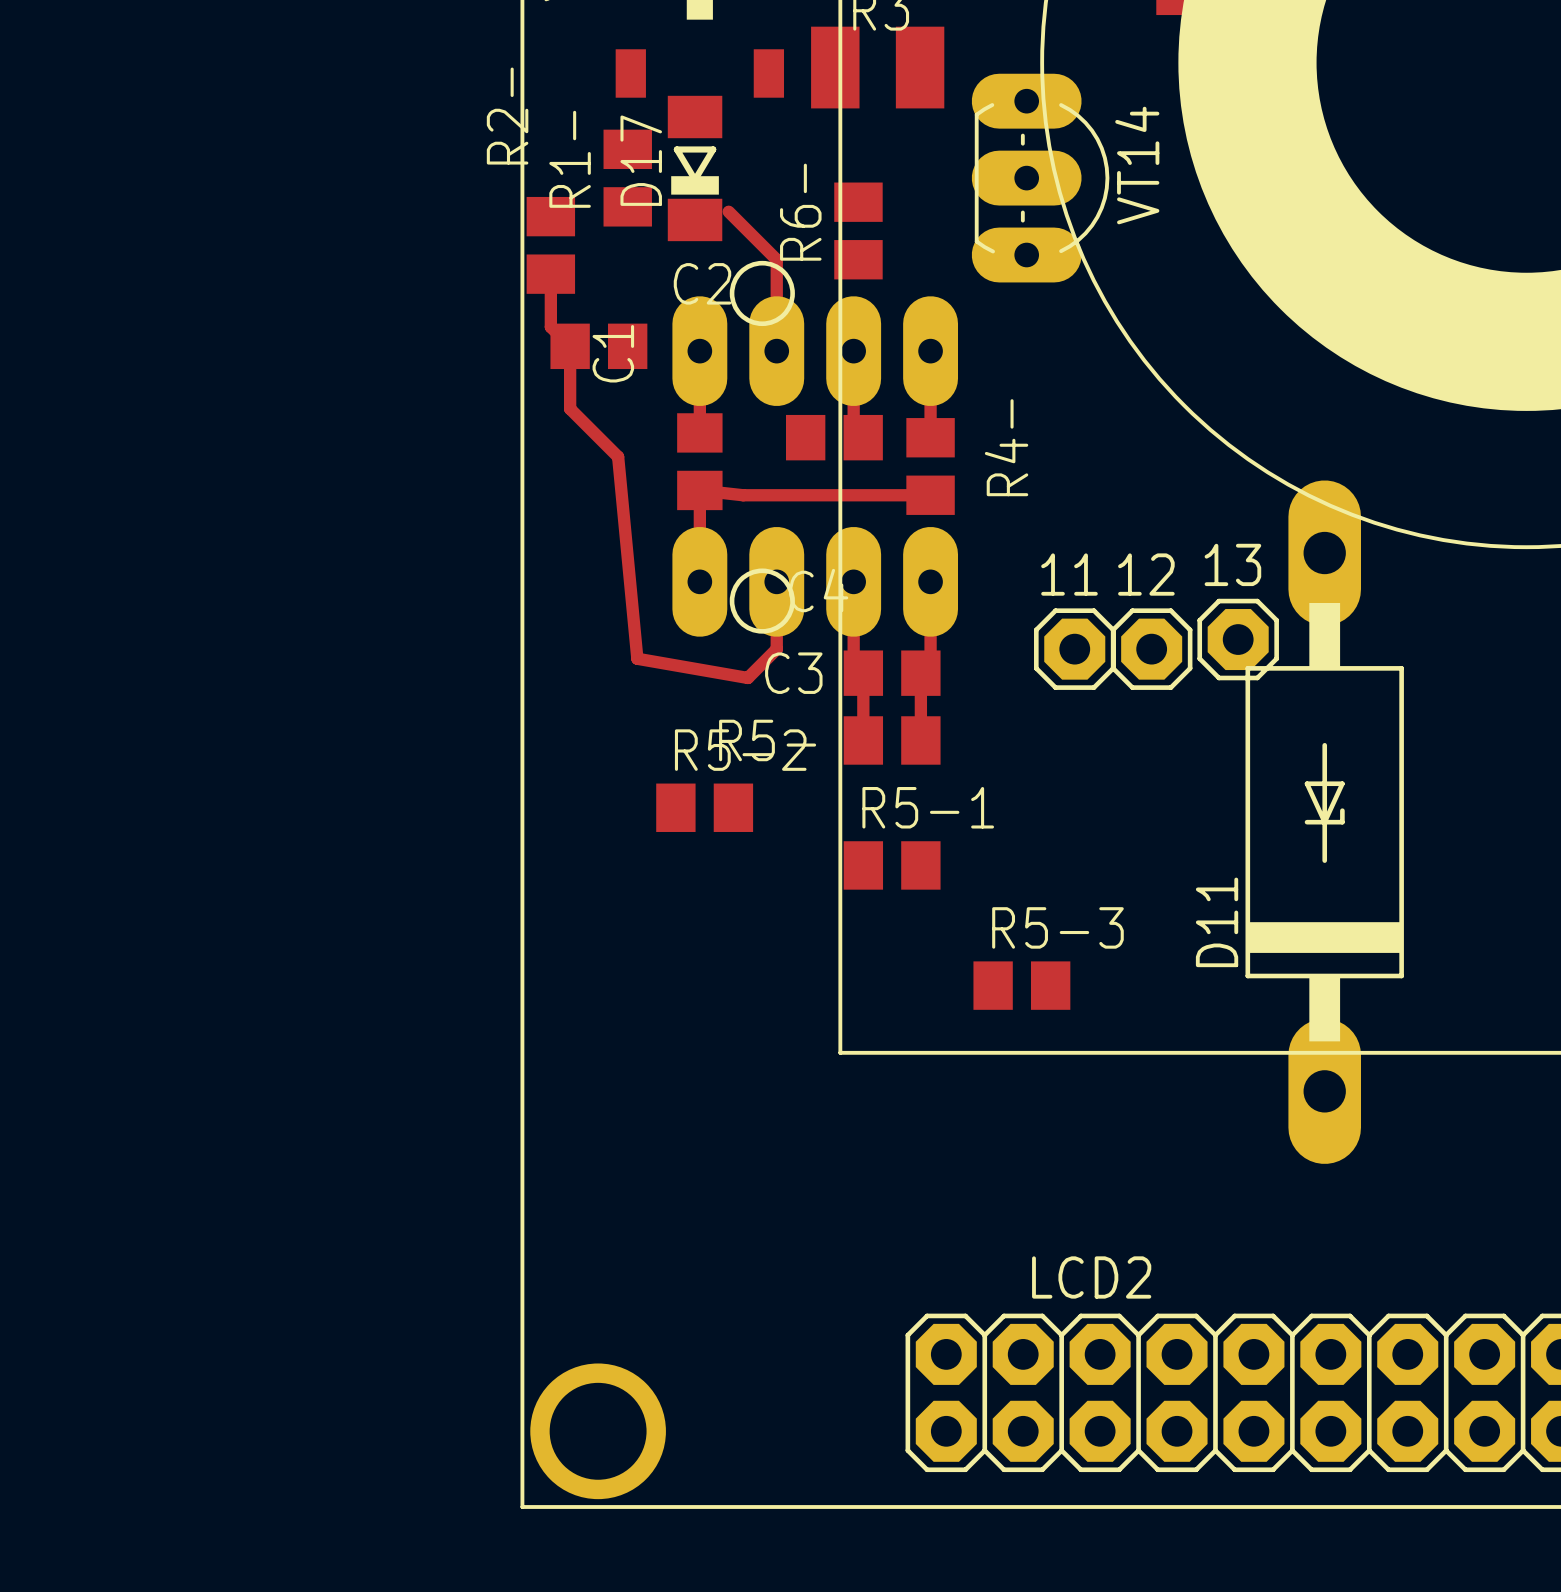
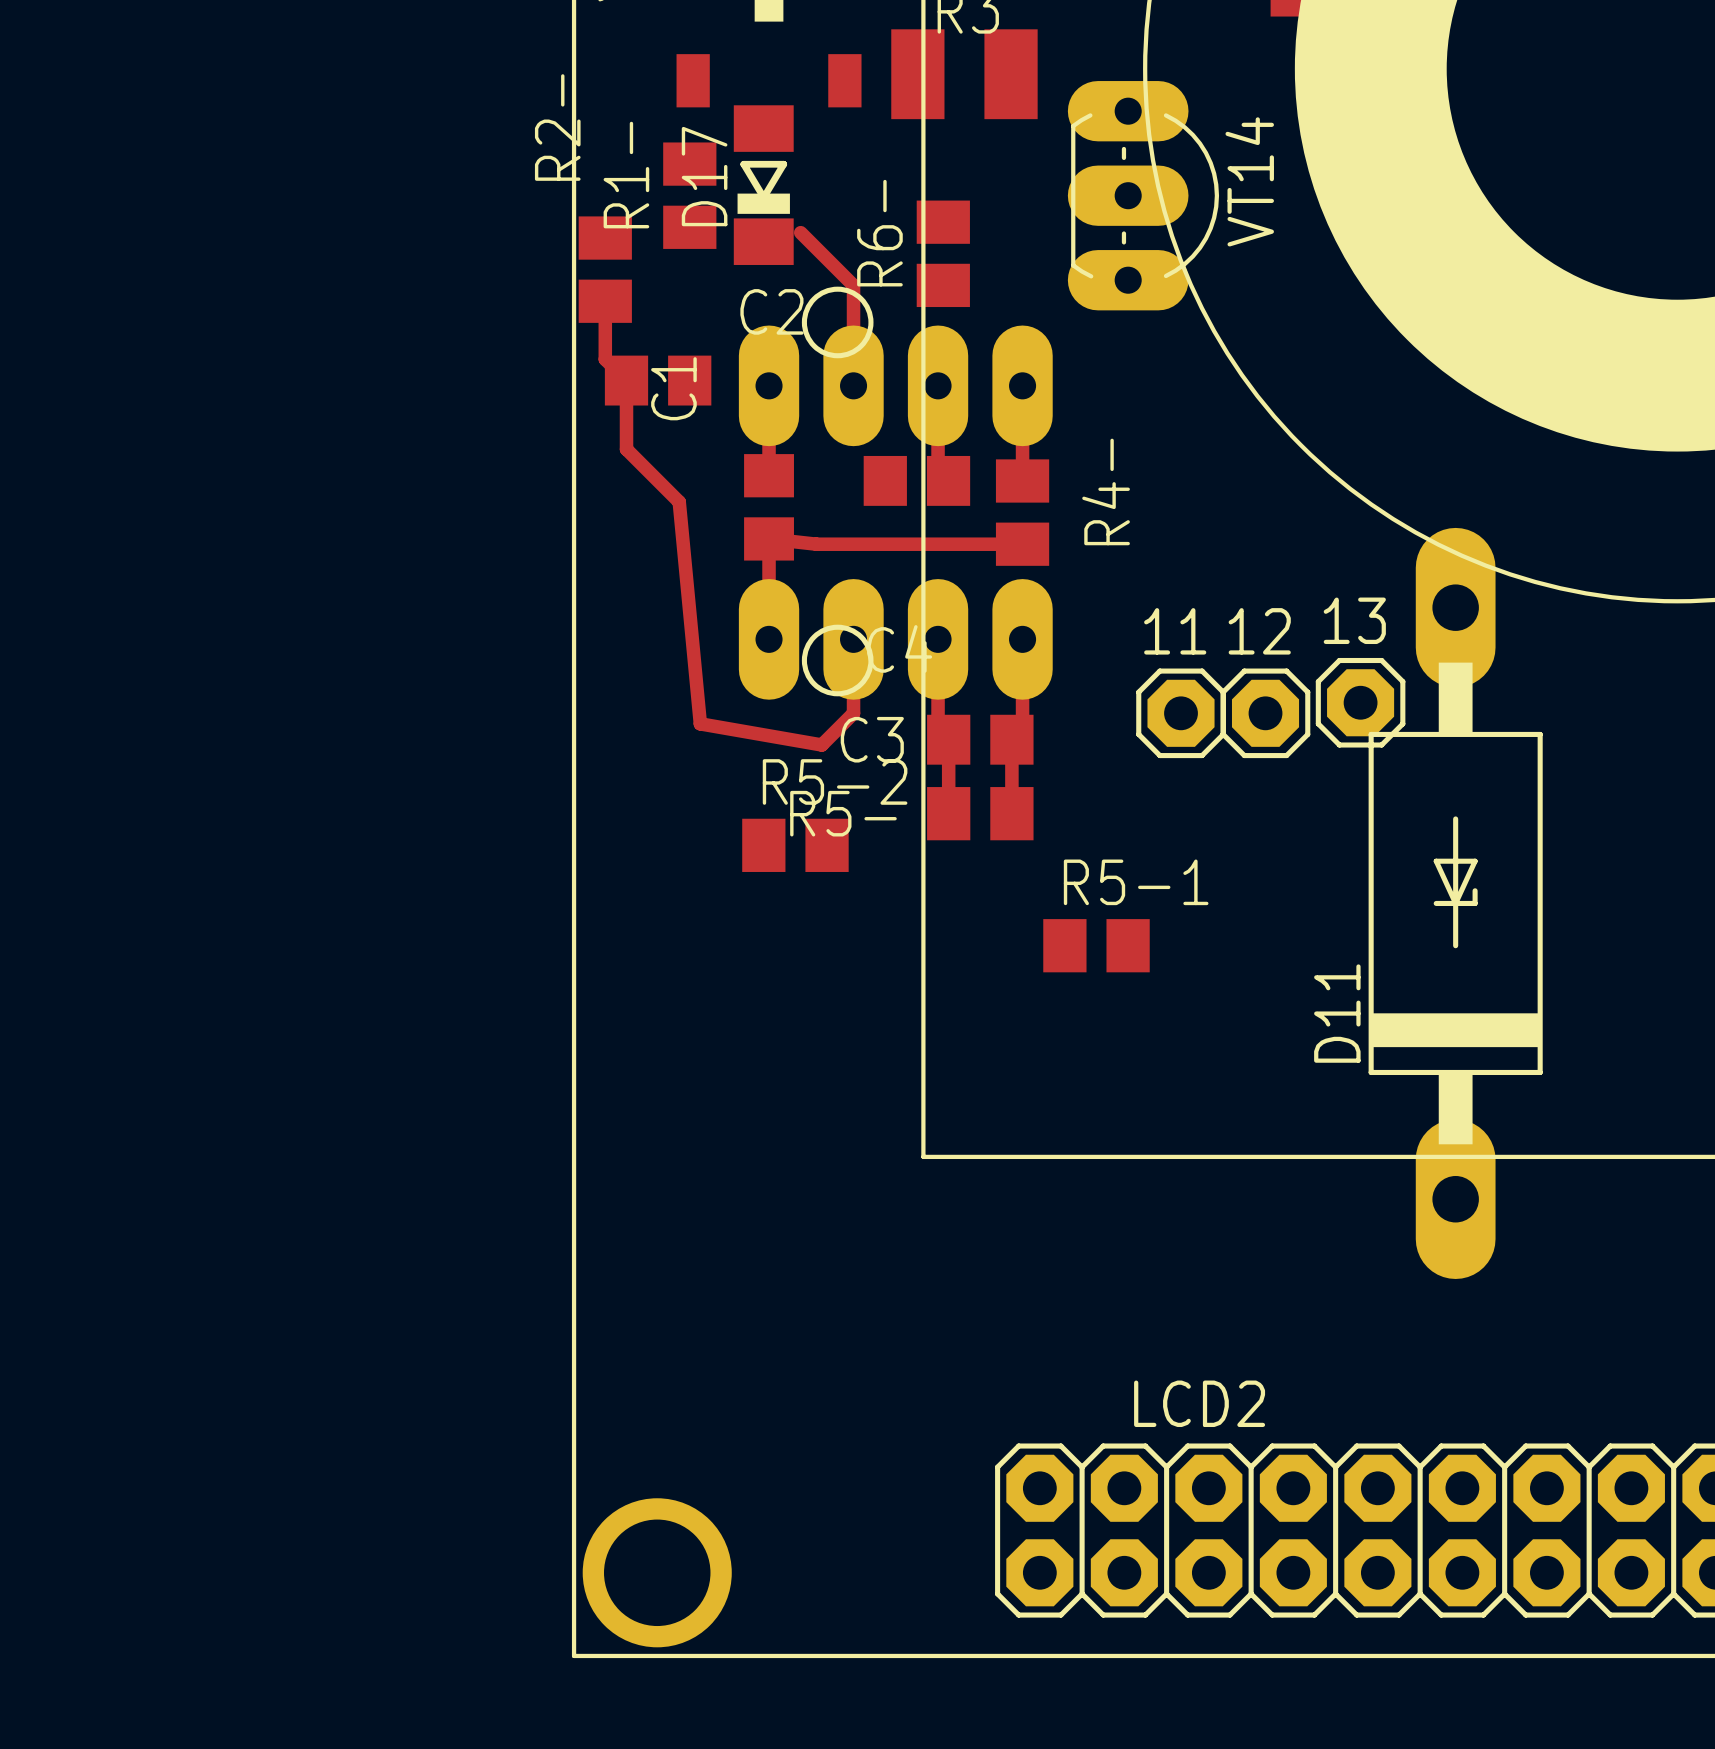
R5-2 position: (704, 807) -> (795, 845)
R5-1 position: (892, 865) -> (1096, 945)
R5-3: (1021, 985) -> none

